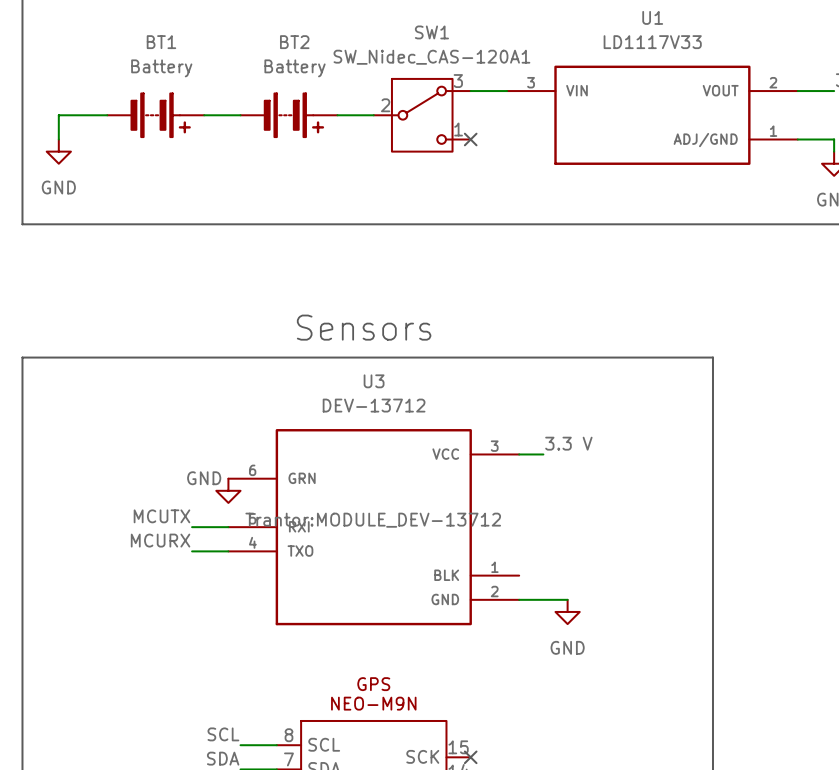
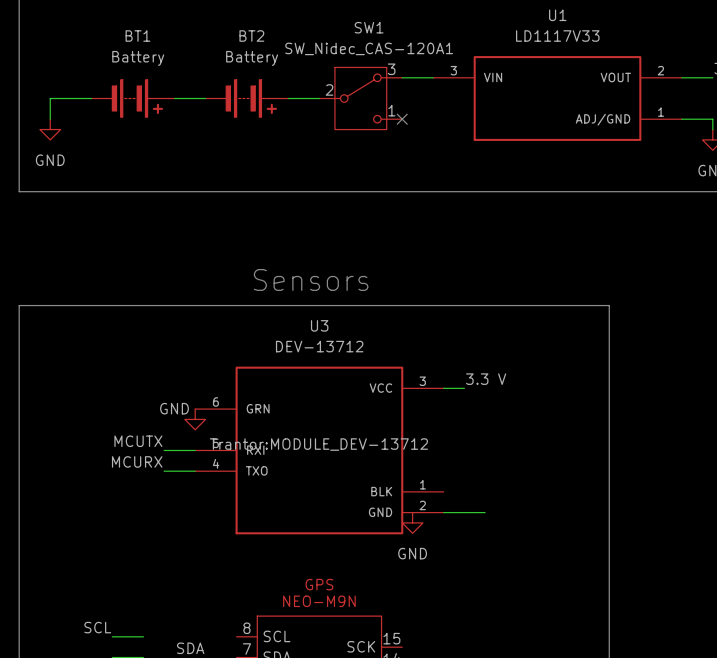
power symbol position: GND (567, 611) -> GND (412, 522)
label position: SCL (223, 734) -> SCL (97, 627)
wire: (240, 745) (276, 745) -> (112, 636) (143, 636)
no-connect mark: (470, 757) -> none
wire: (240, 769) (276, 769) -> (112, 657) (143, 657)

